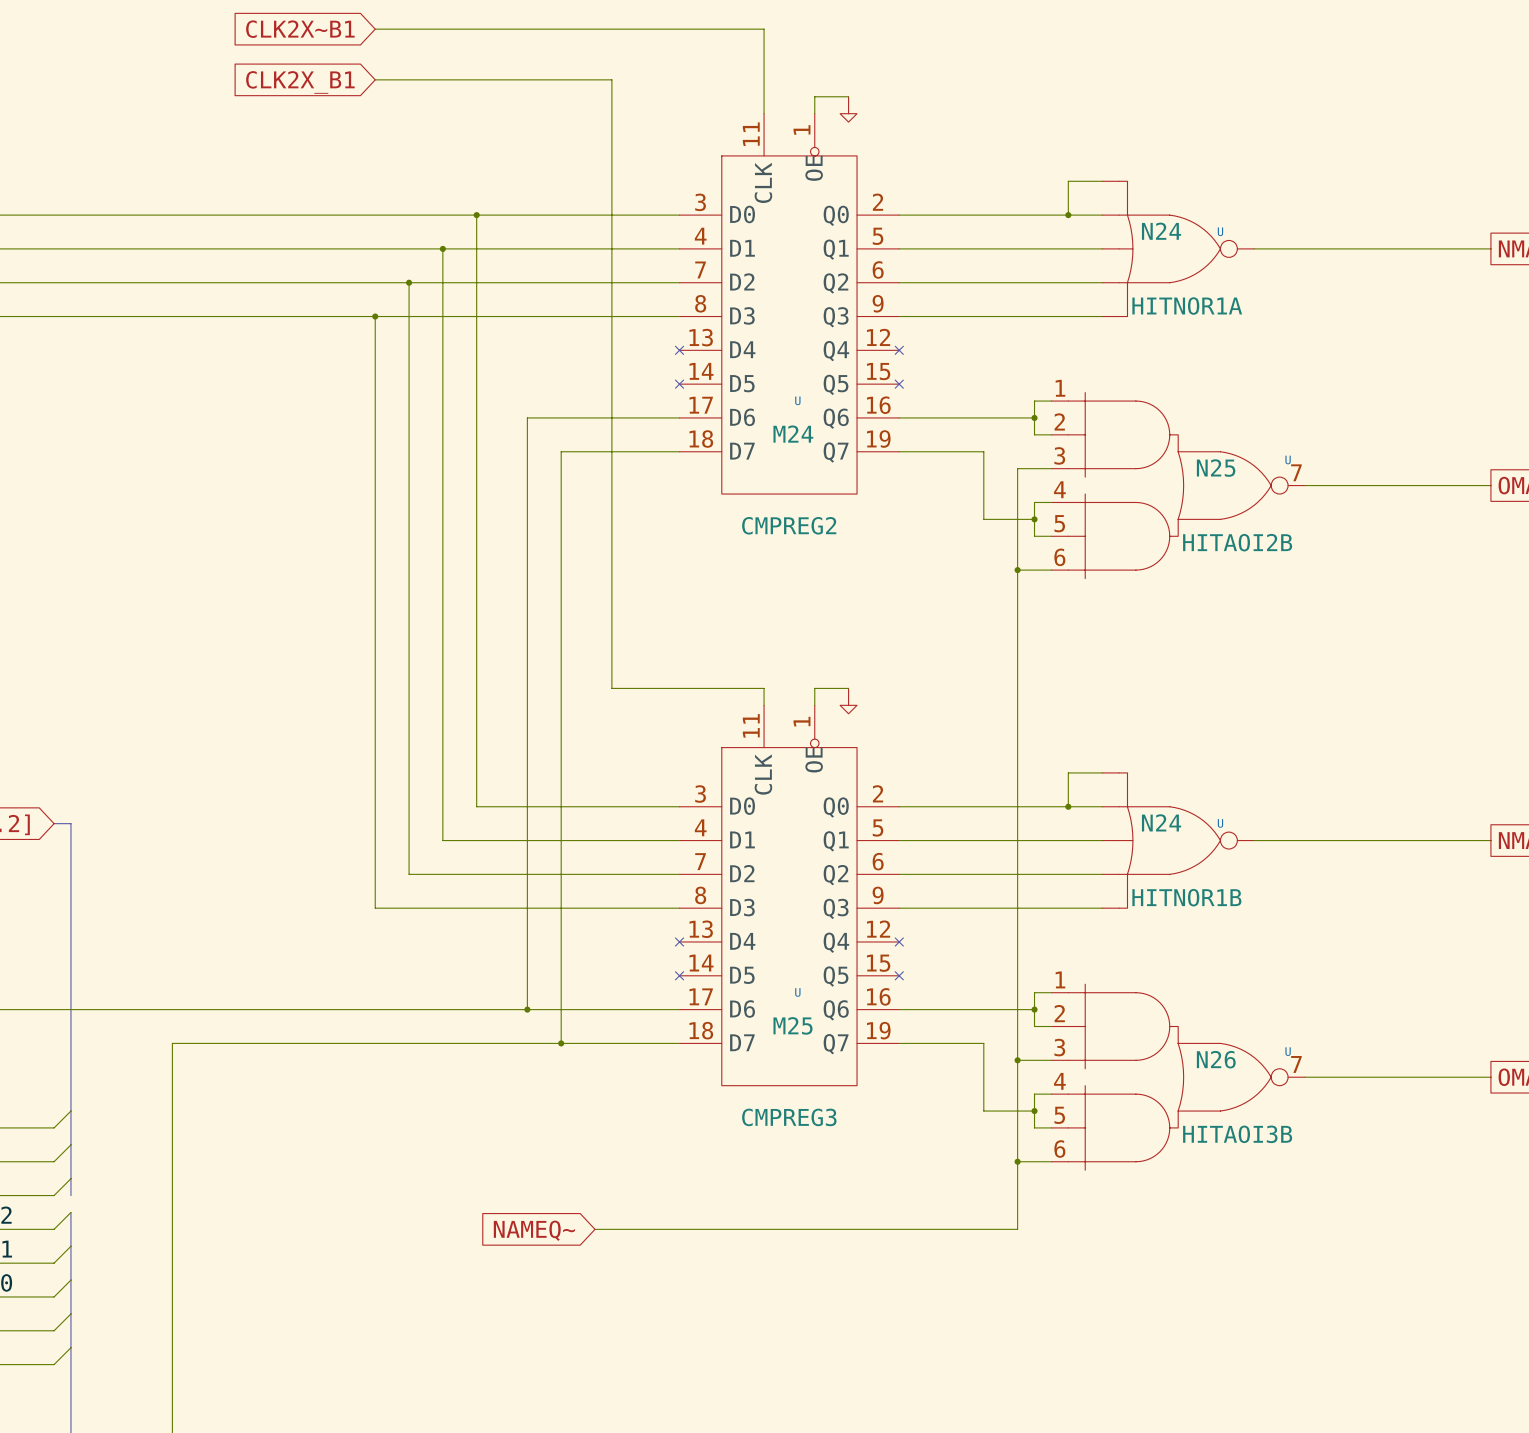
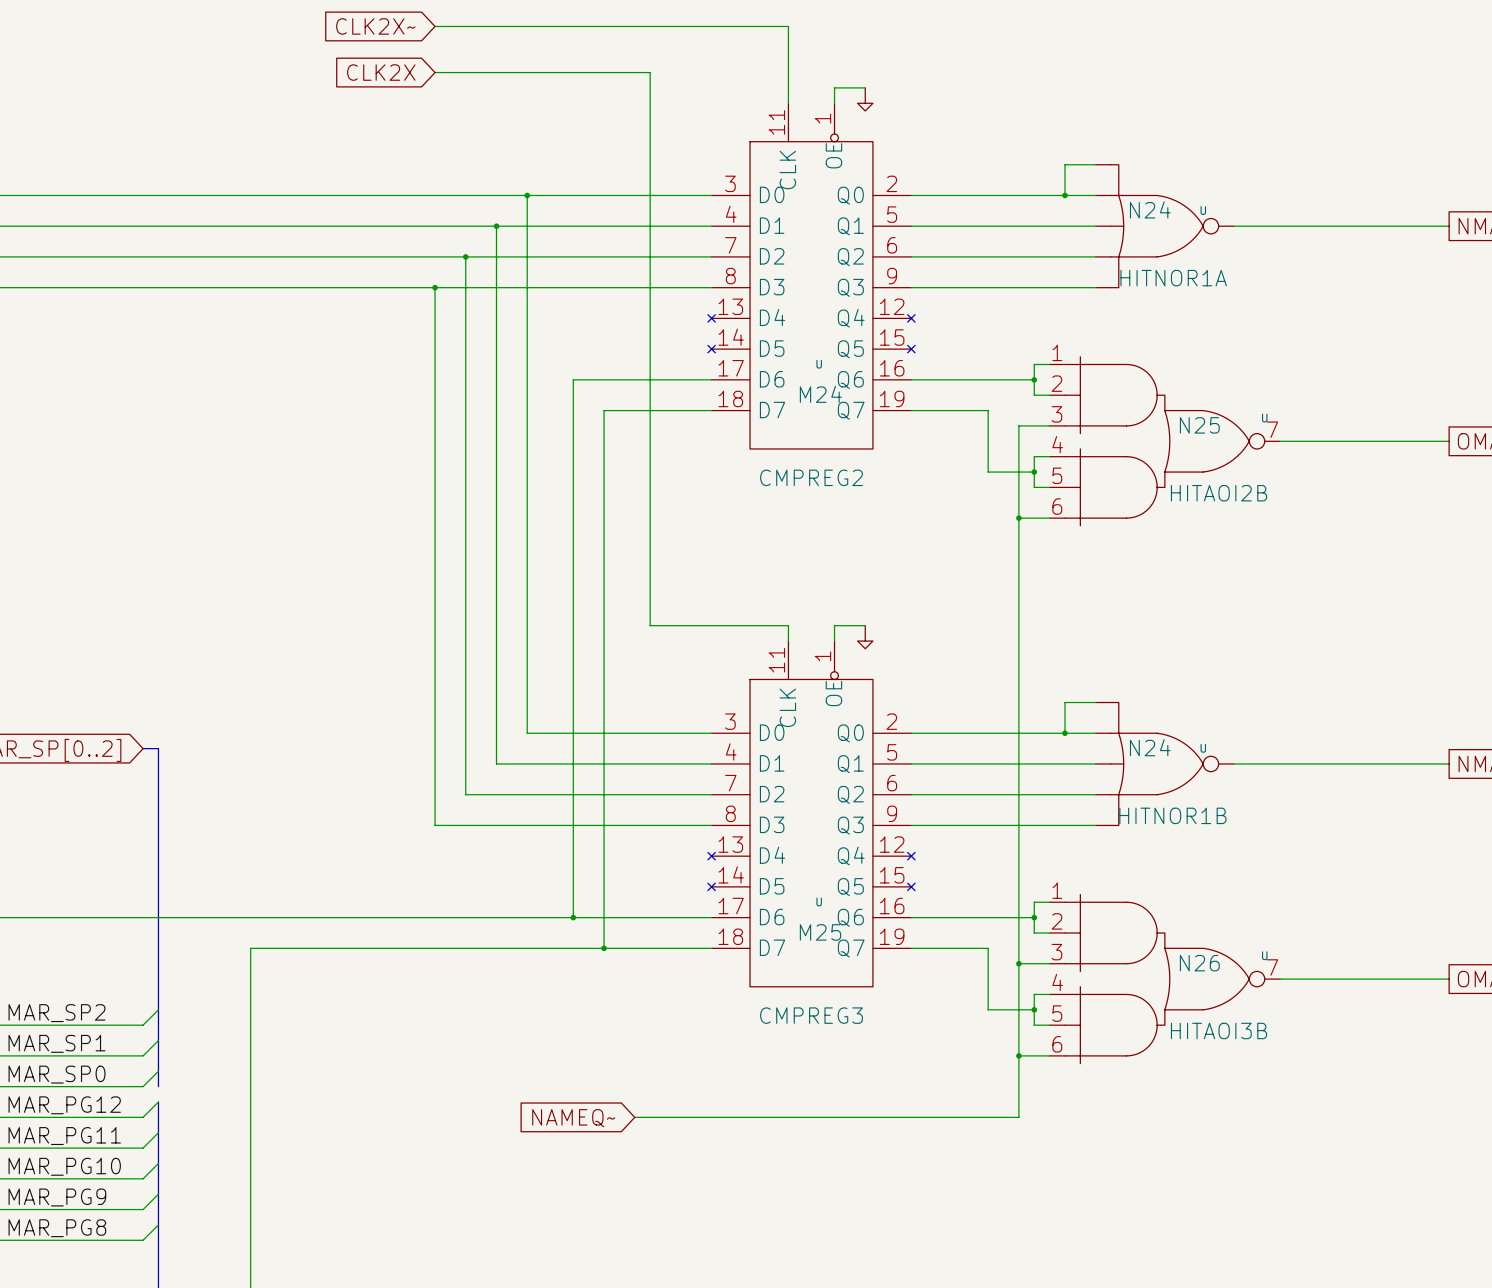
global label: CLK2X~B1 (300, 29) -> CLK2X~ (375, 26)
global label: CLK2X_B1 (300, 82) -> CLK2X (381, 72)

